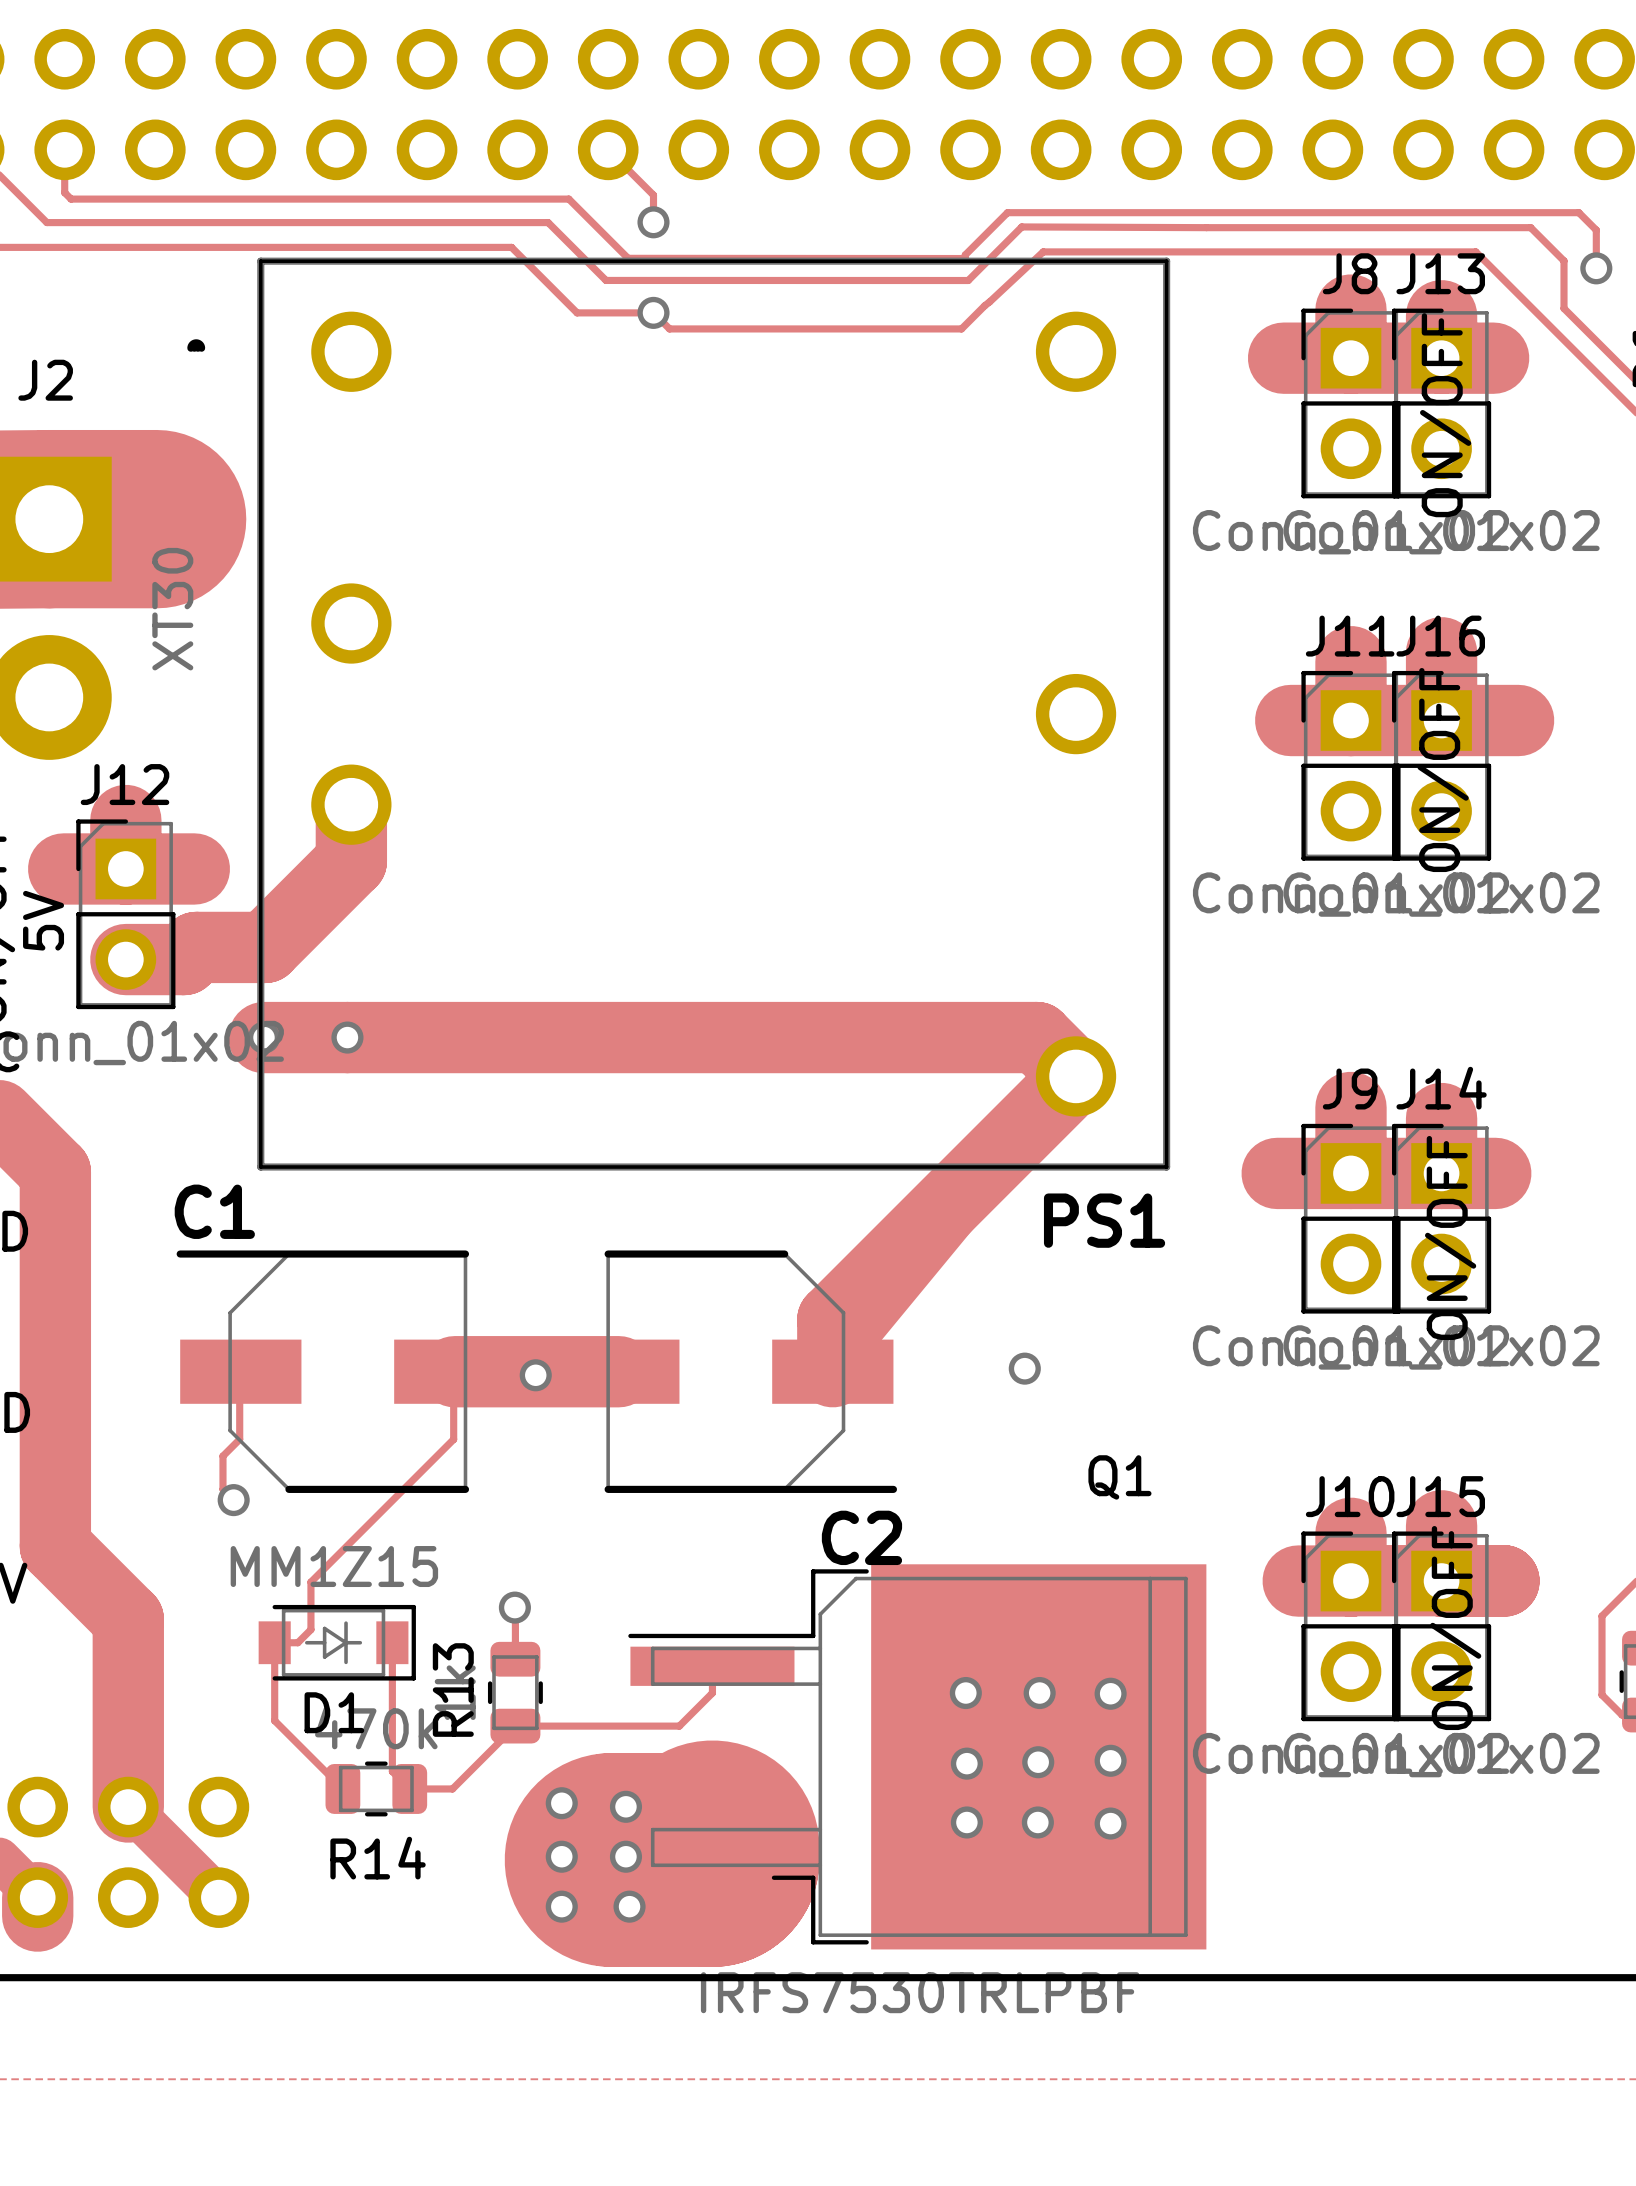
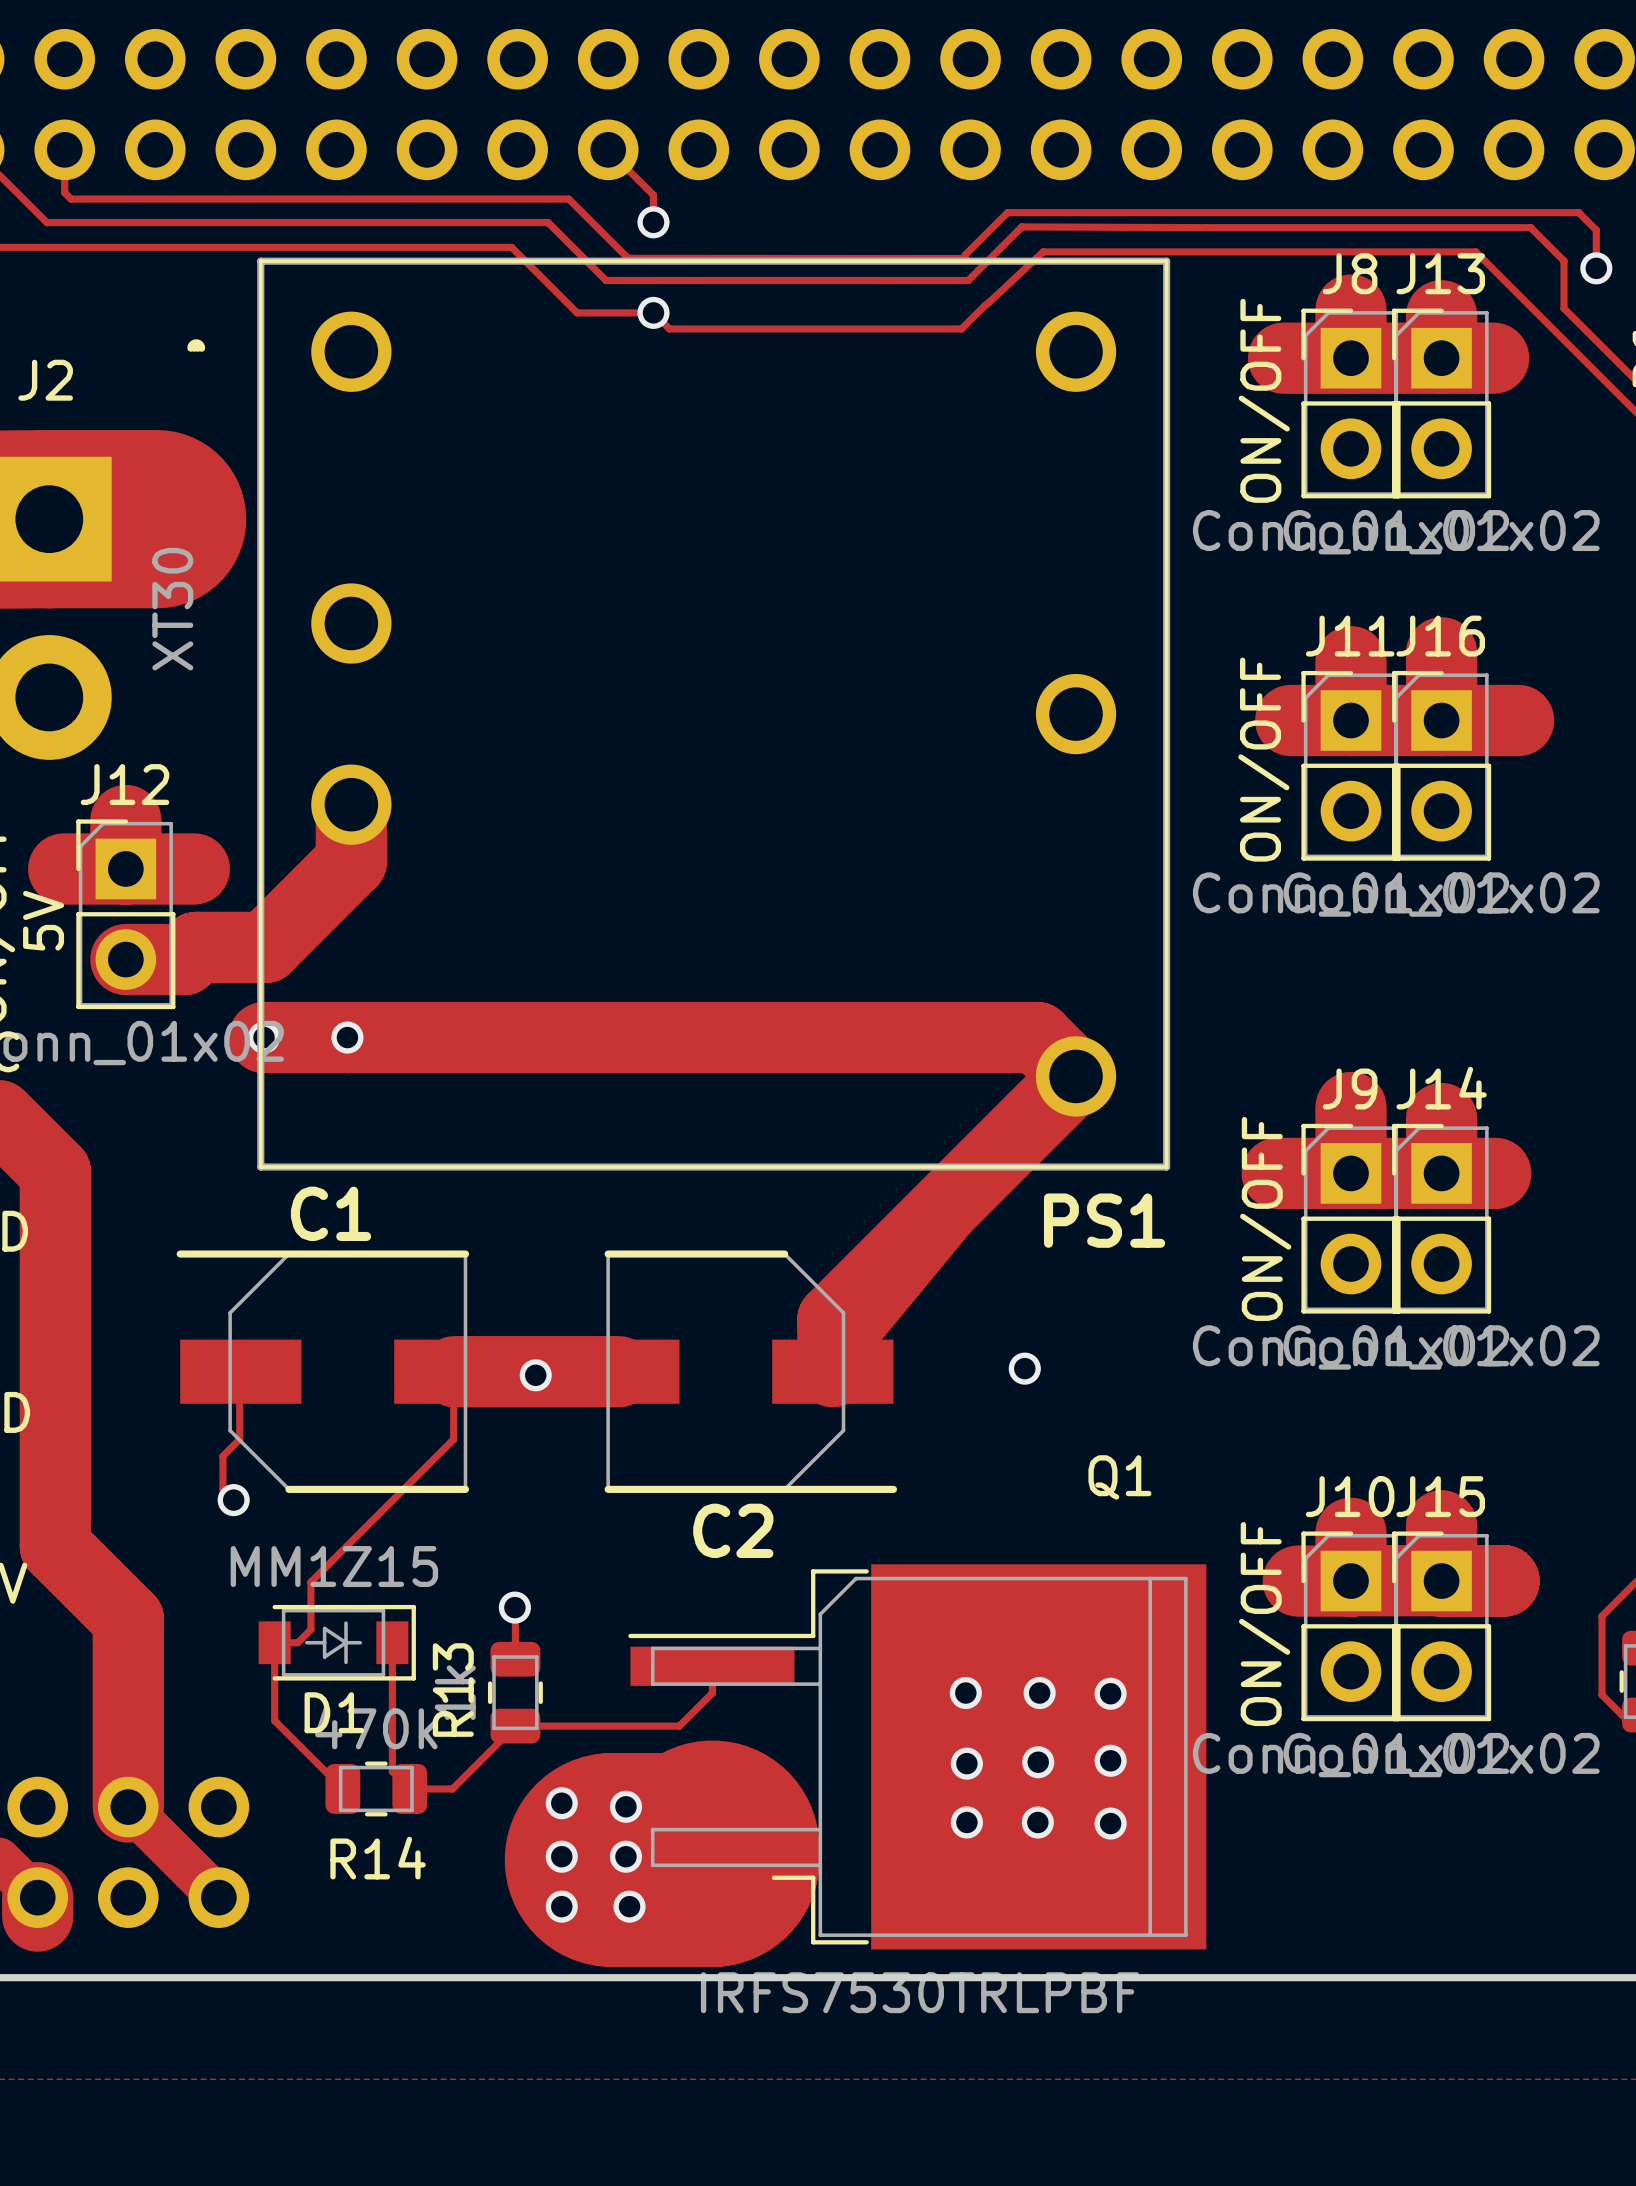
text position: ON/OFF (1445, 415) -> ON/OFF (1264, 400)
text position: ON/OFF (1443, 770) -> ON/OFF (1263, 759)
C1 name position: C1 (214, 1211) -> C1 (331, 1213)
text position: ON/OFF (1450, 1237) -> ON/OFF (1265, 1218)
C2 name position: C2 (861, 1537) -> C2 (733, 1530)
text position: ON/OFF (1455, 1628) -> ON/OFF (1264, 1624)

